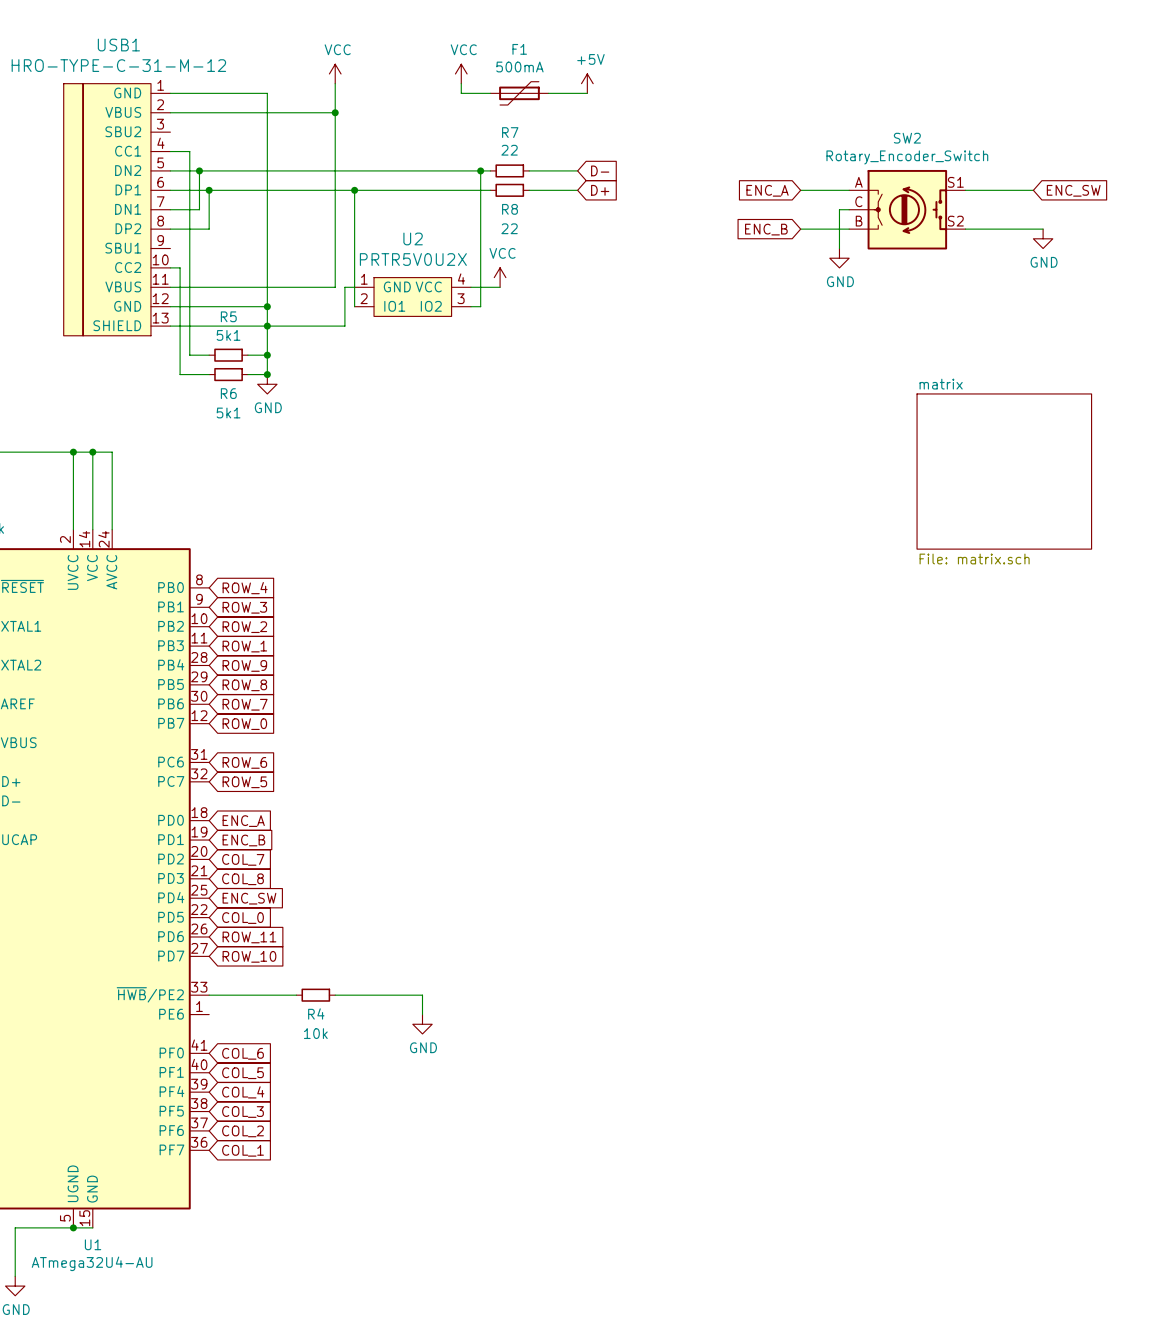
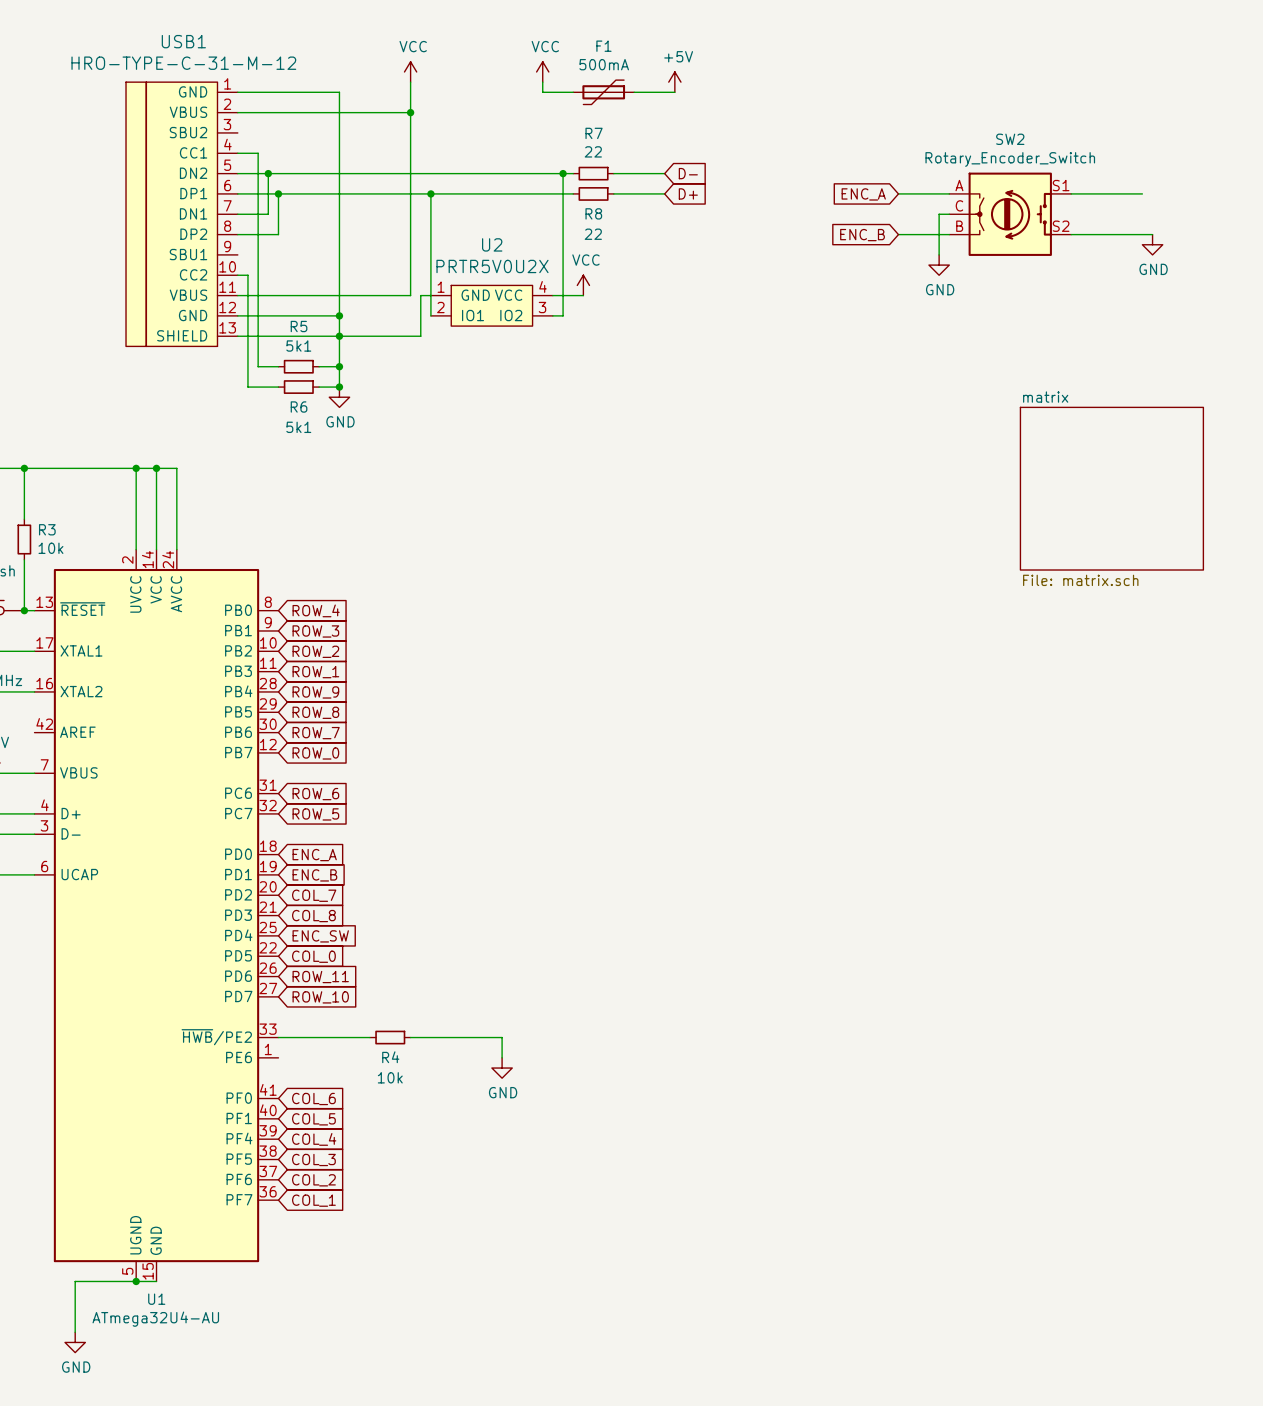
global label: ENC_SW (1073, 190) -> none

